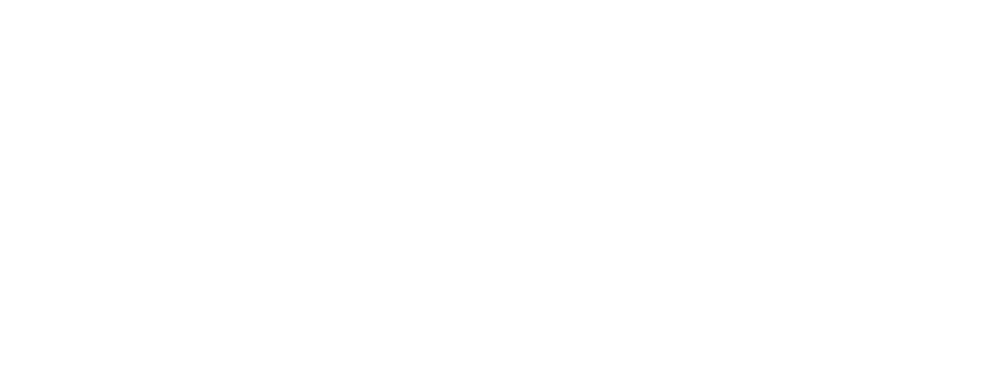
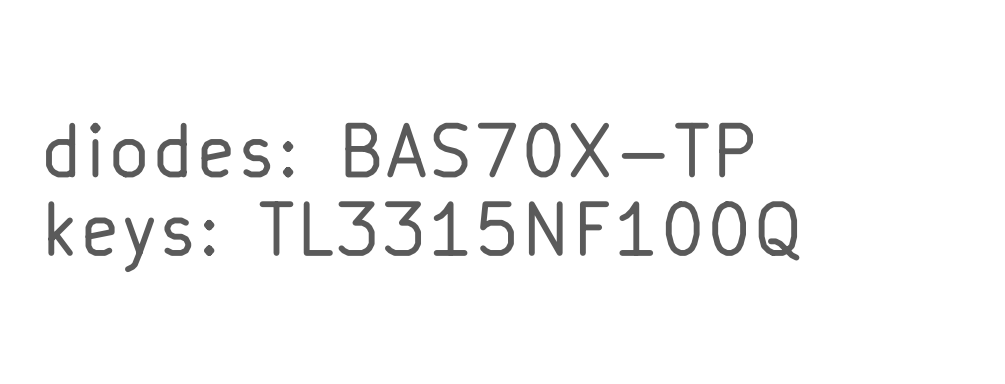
text: none -> diodes: BAS70X-TP (399, 150)
text: none -> keys: TL3315NF100Q (423, 236)

